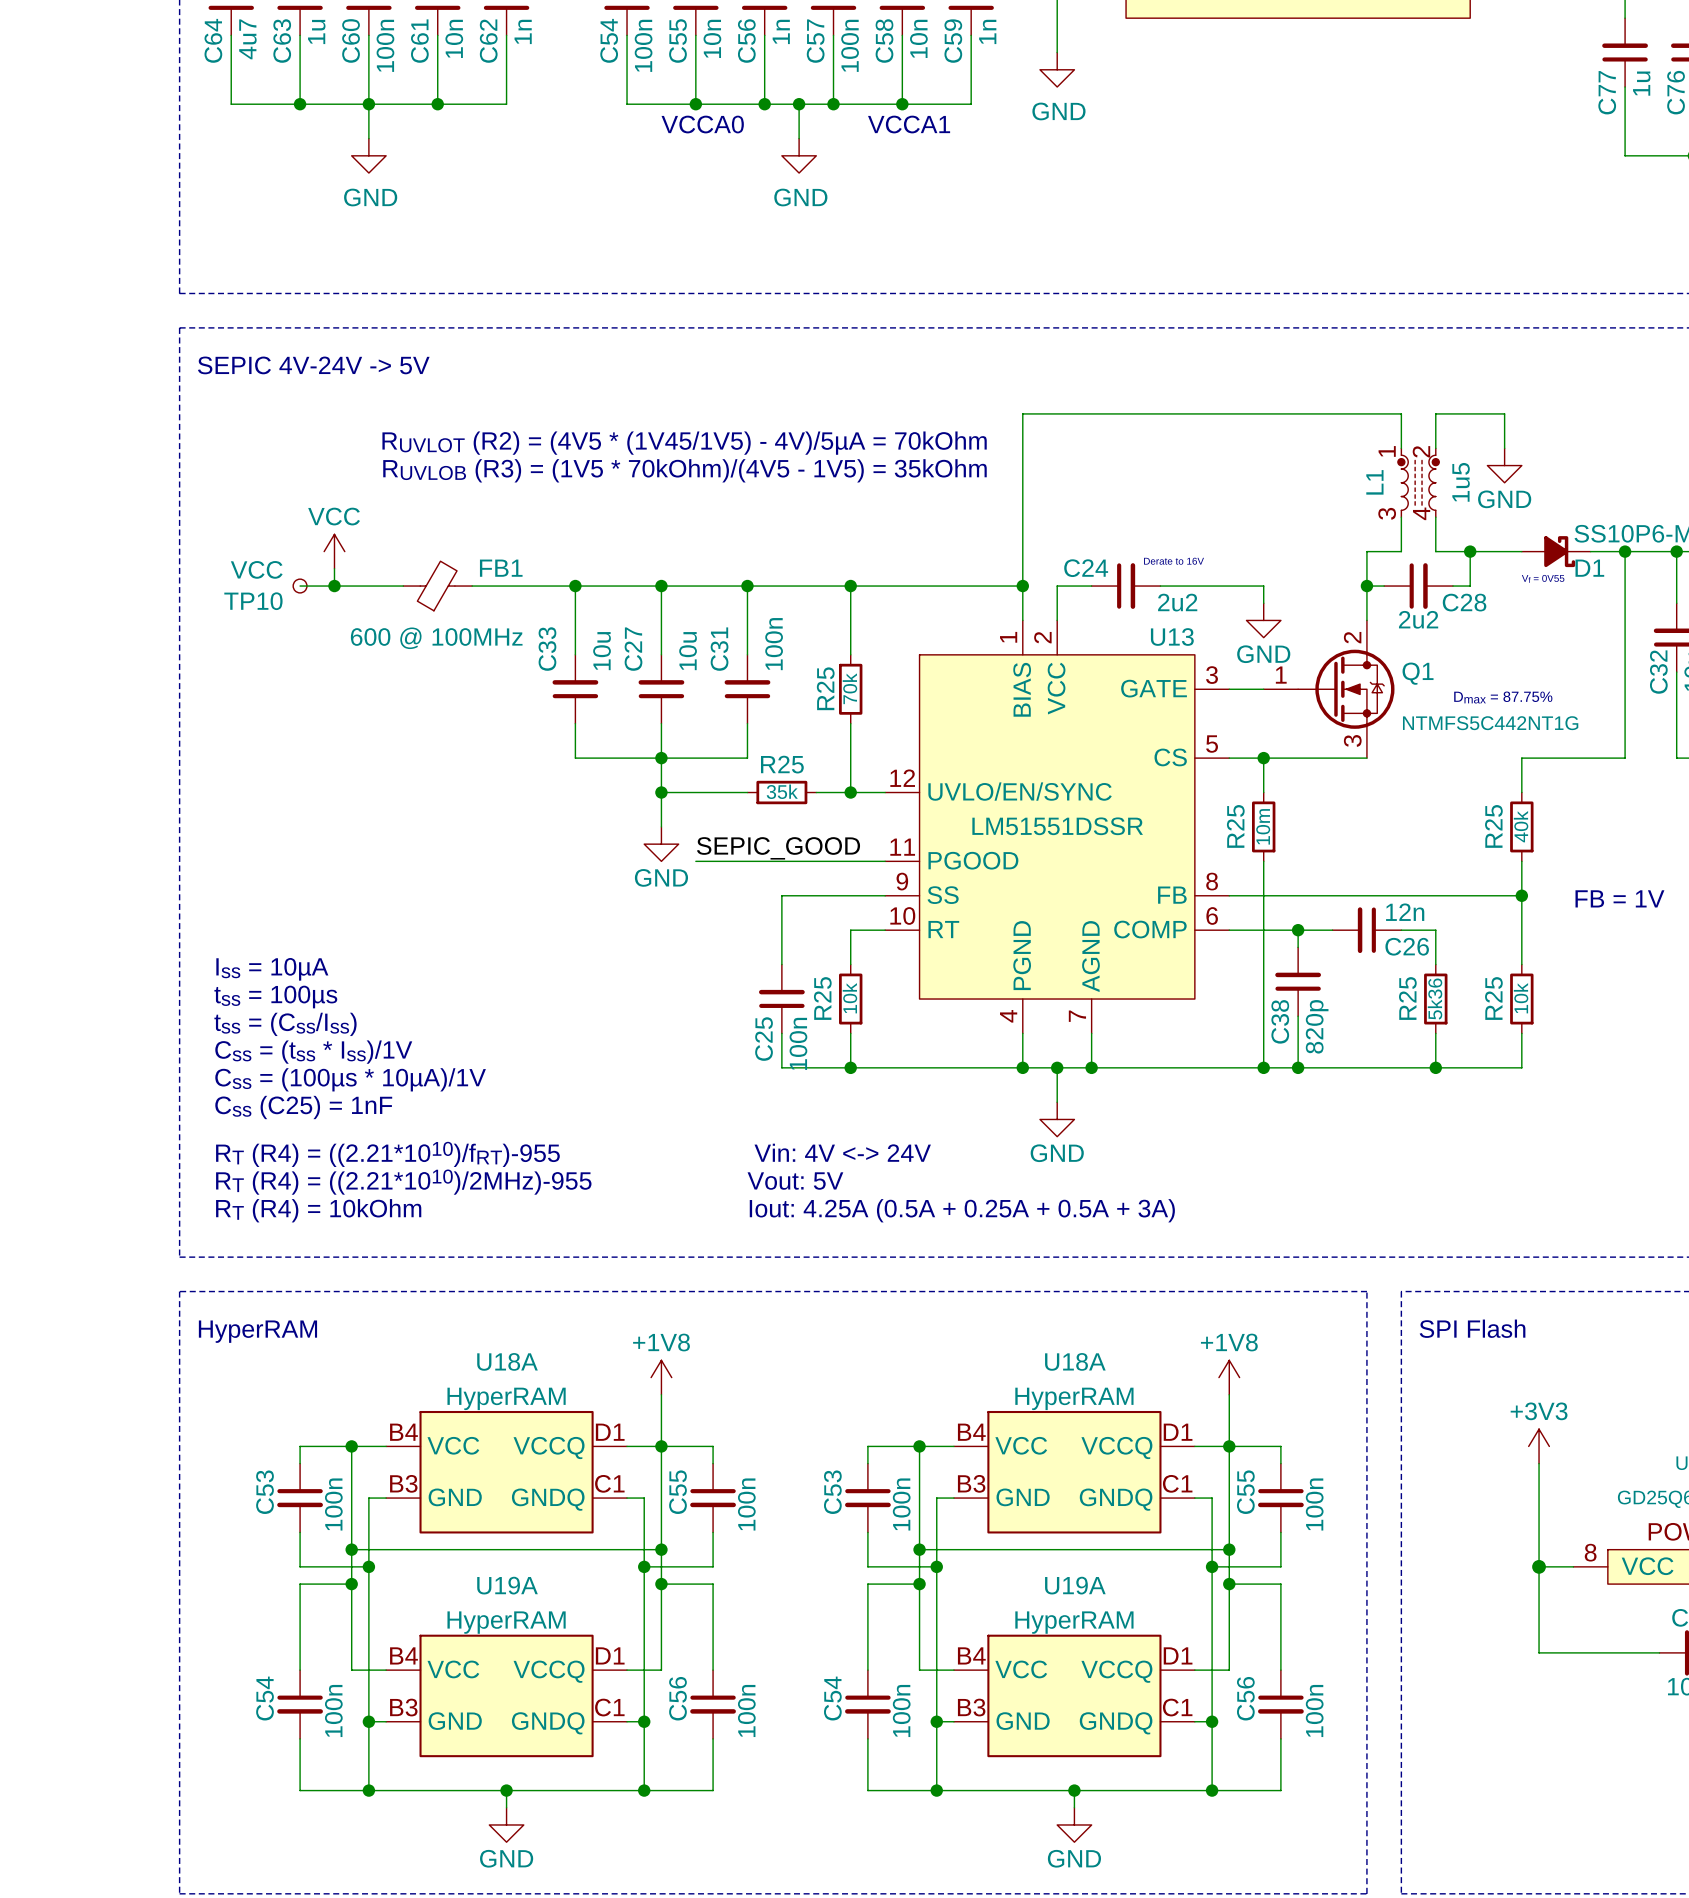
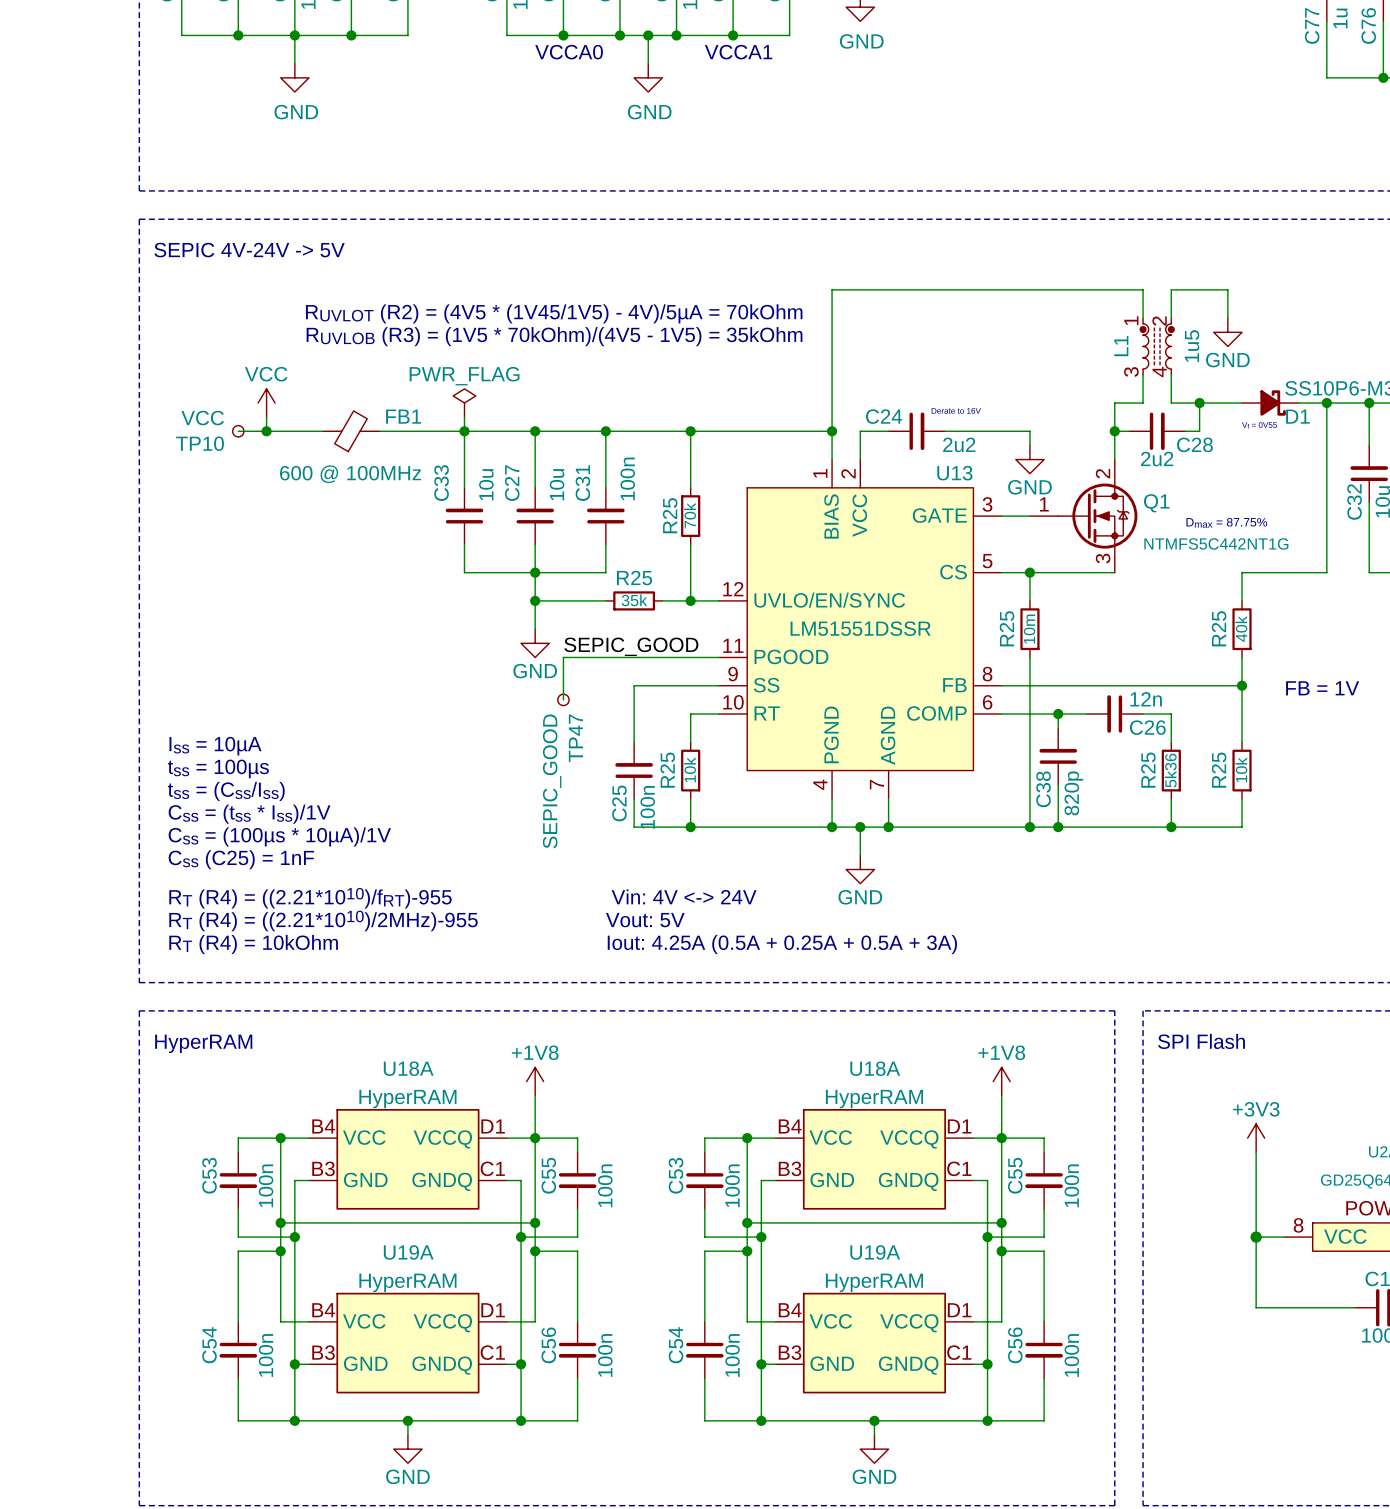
power symbol: none -> PWR_FLAG (464, 403)
wire: none -> (464, 417) (464, 431)
wire: none -> (563, 657) (563, 699)
TP47: none -> SEPIC_GOOD (563, 699)

